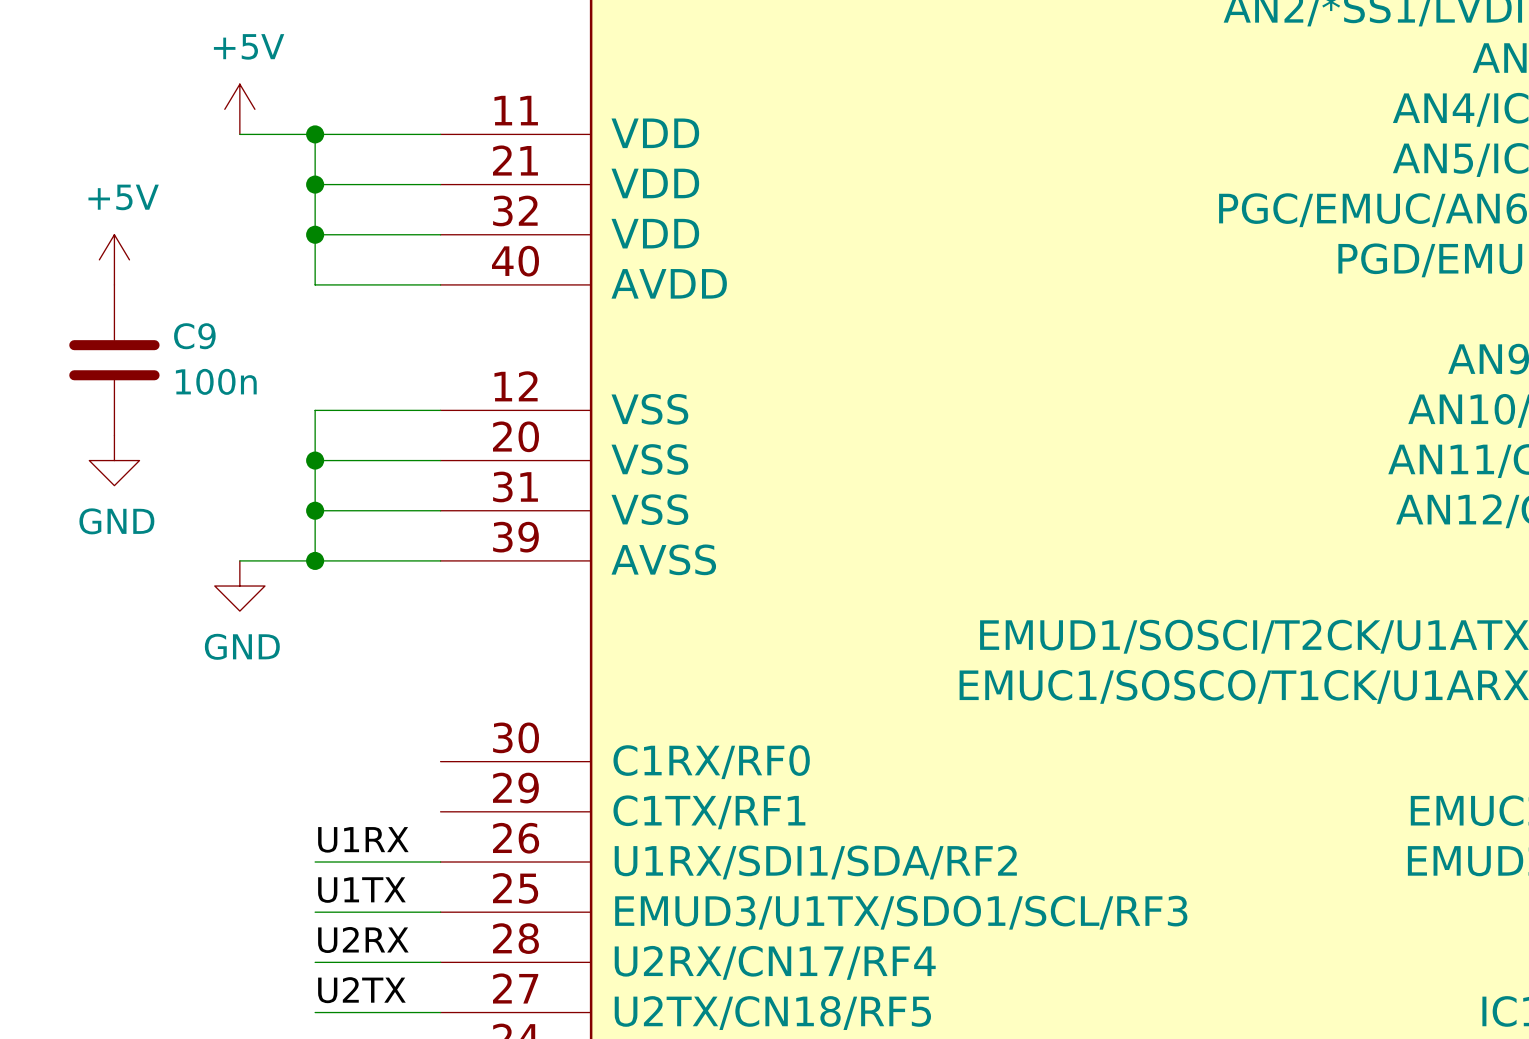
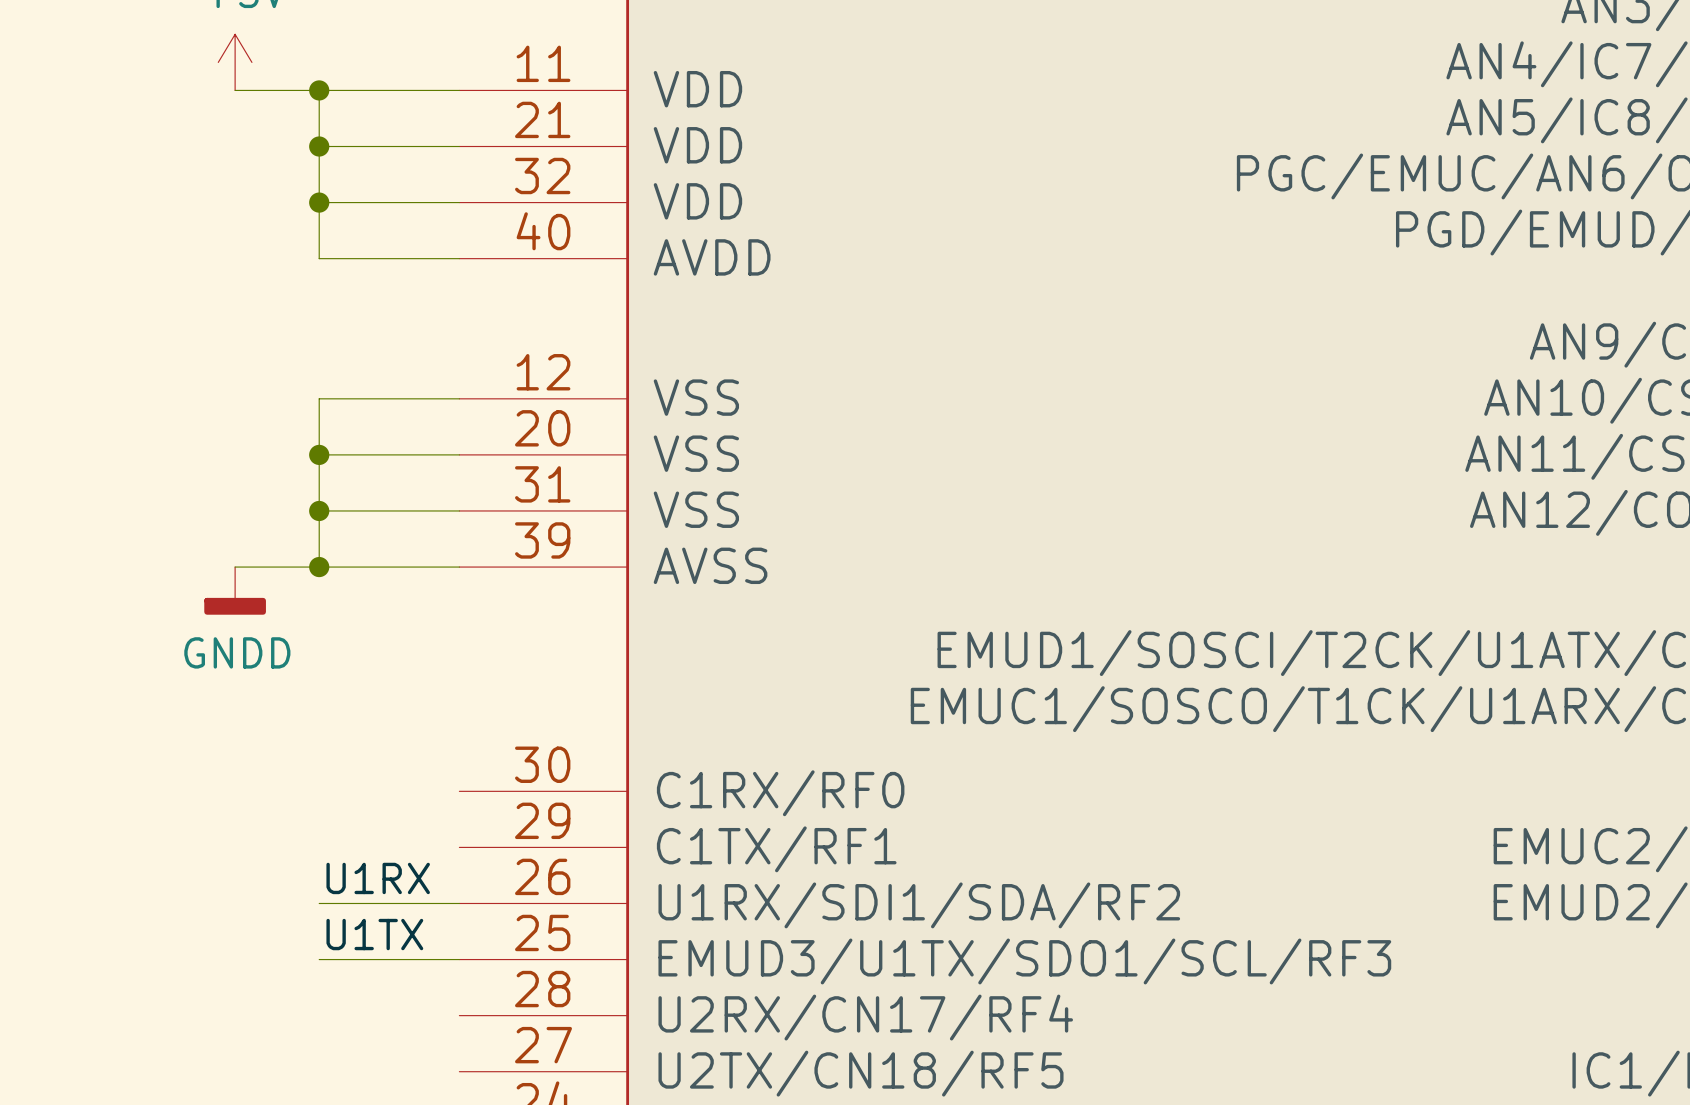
power symbol: +5V (114, 259) -> none
C9: 100n (114, 360) -> none
power symbol: GND (114, 460) -> none
power symbol: GND (239, 586) -> GNDD (235, 590)
label: U2RX (363, 939) -> none
wire: (315, 962) (440, 962) -> none
label: U2TX (361, 990) -> none
wire: (315, 1012) (440, 1012) -> none

